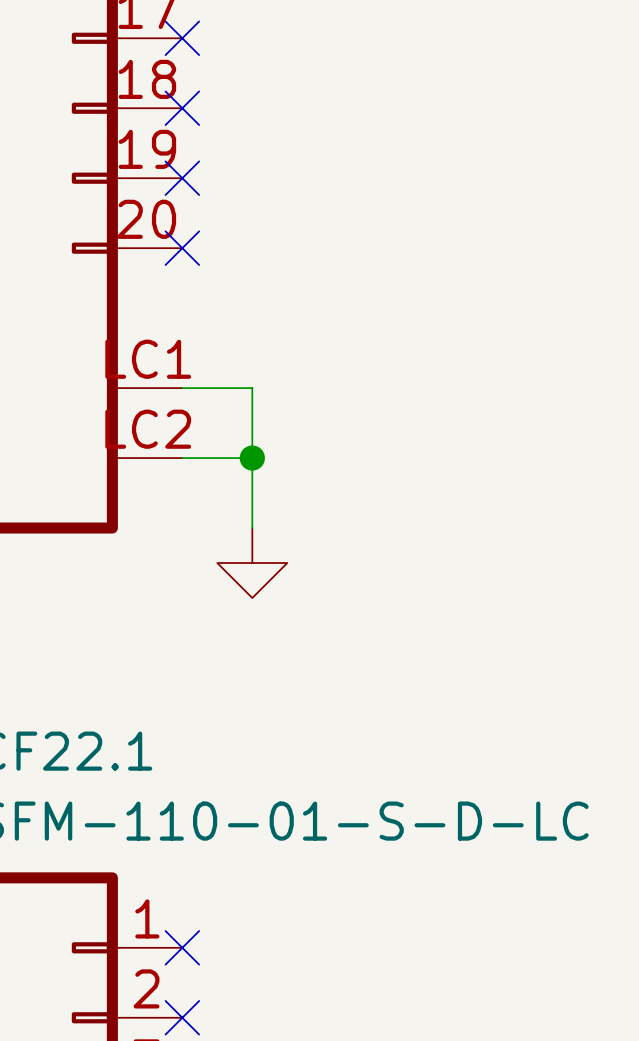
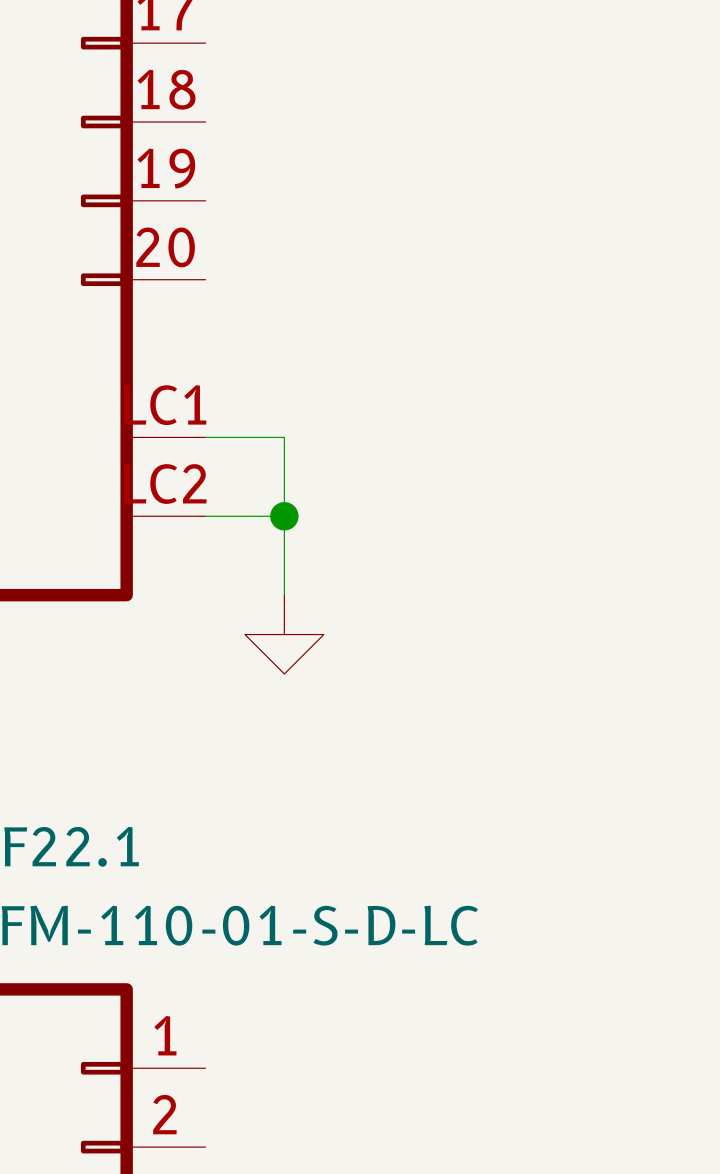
no-connect mark: (182, 38) -> none
no-connect mark: (182, 108) -> none
no-connect mark: (182, 178) -> none
no-connect mark: (182, 248) -> none
no-connect mark: (182, 947) -> none
no-connect mark: (182, 1017) -> none

